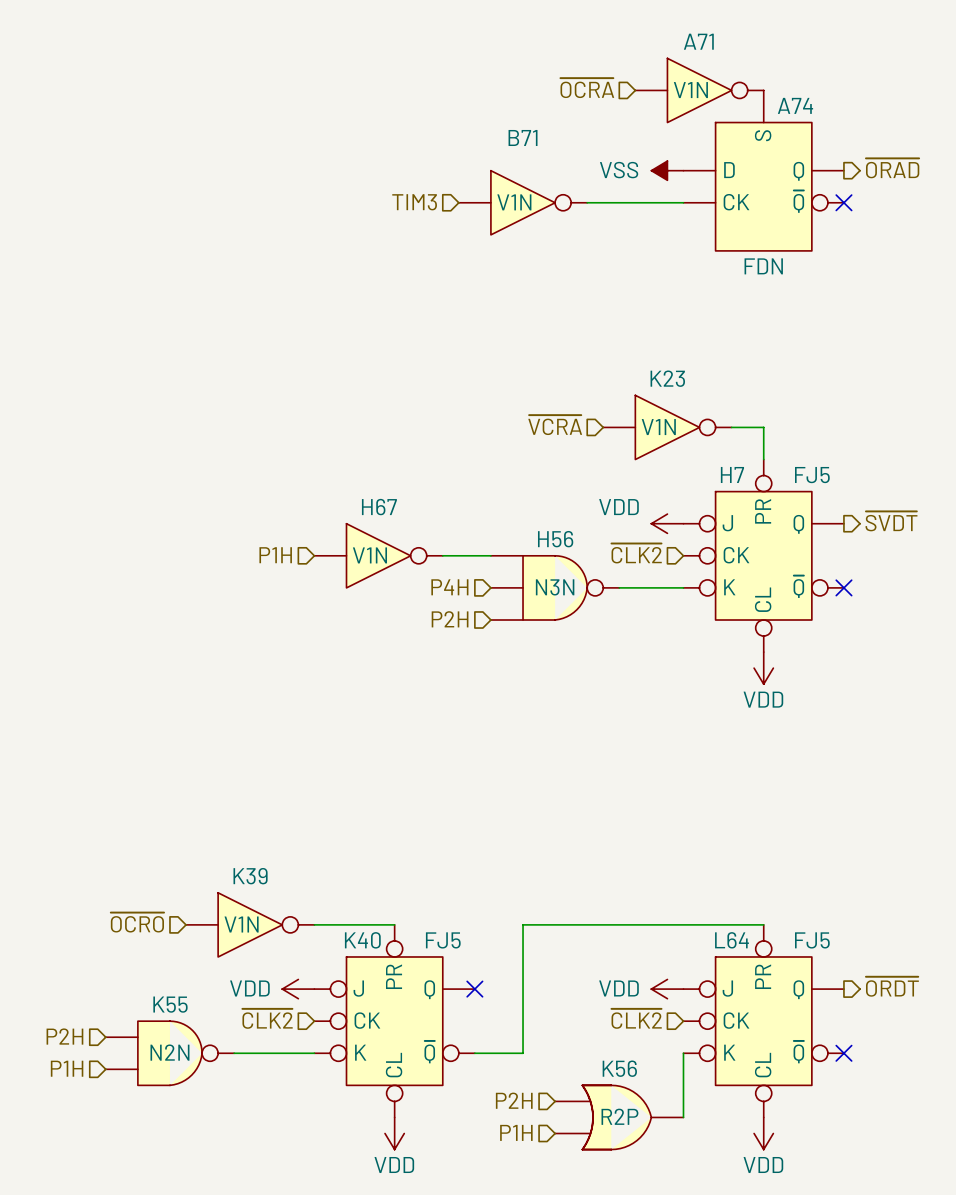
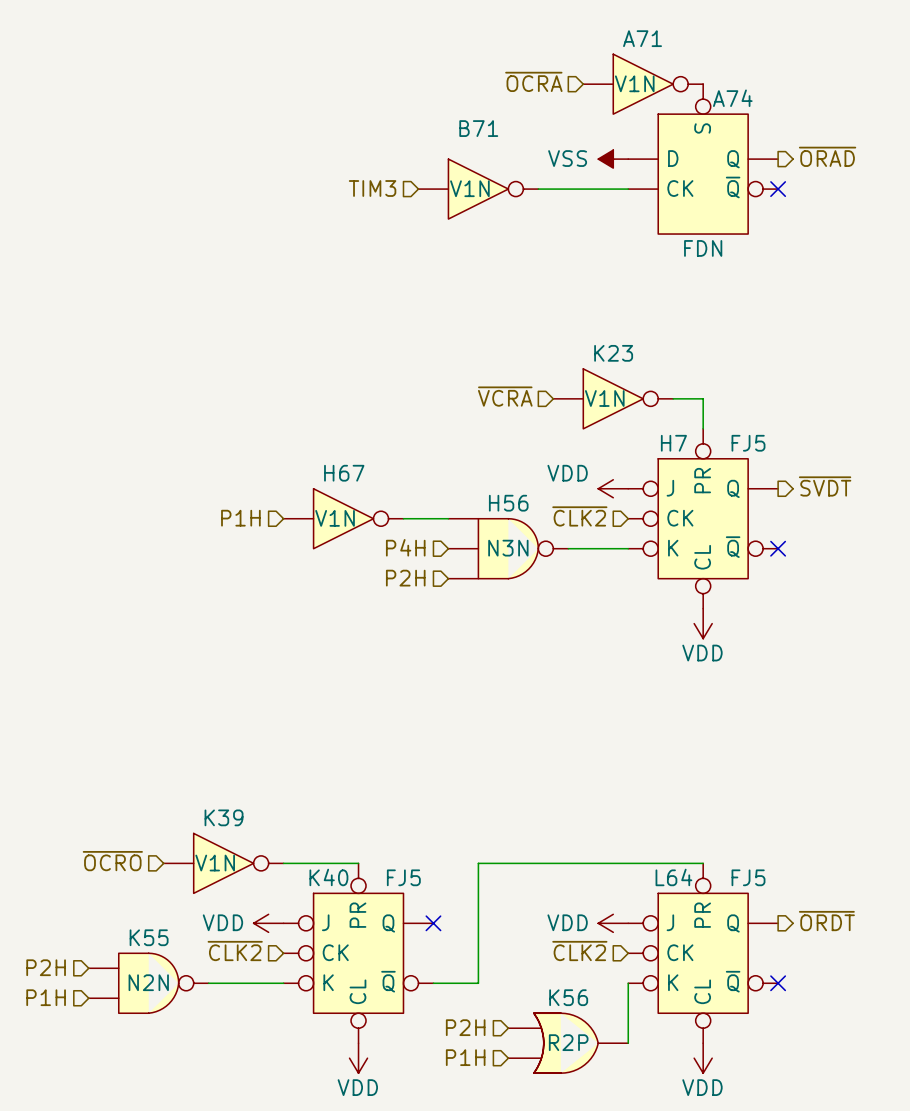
A74 symbol: [683, 90, 844, 251] -> [628, 84, 779, 235]

